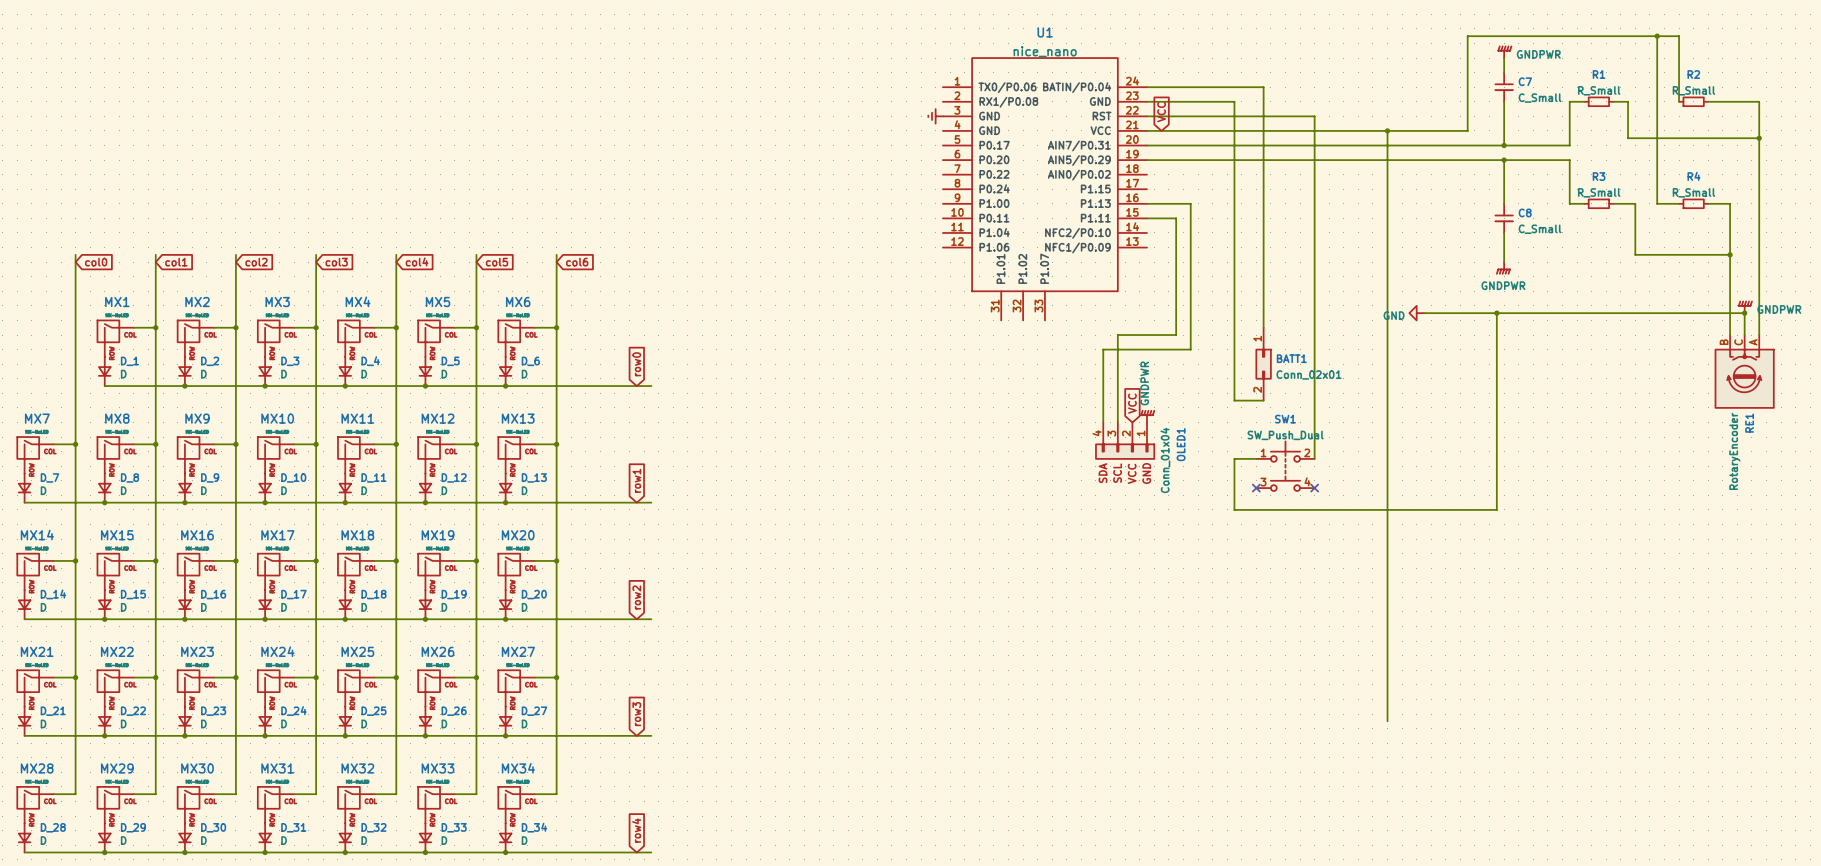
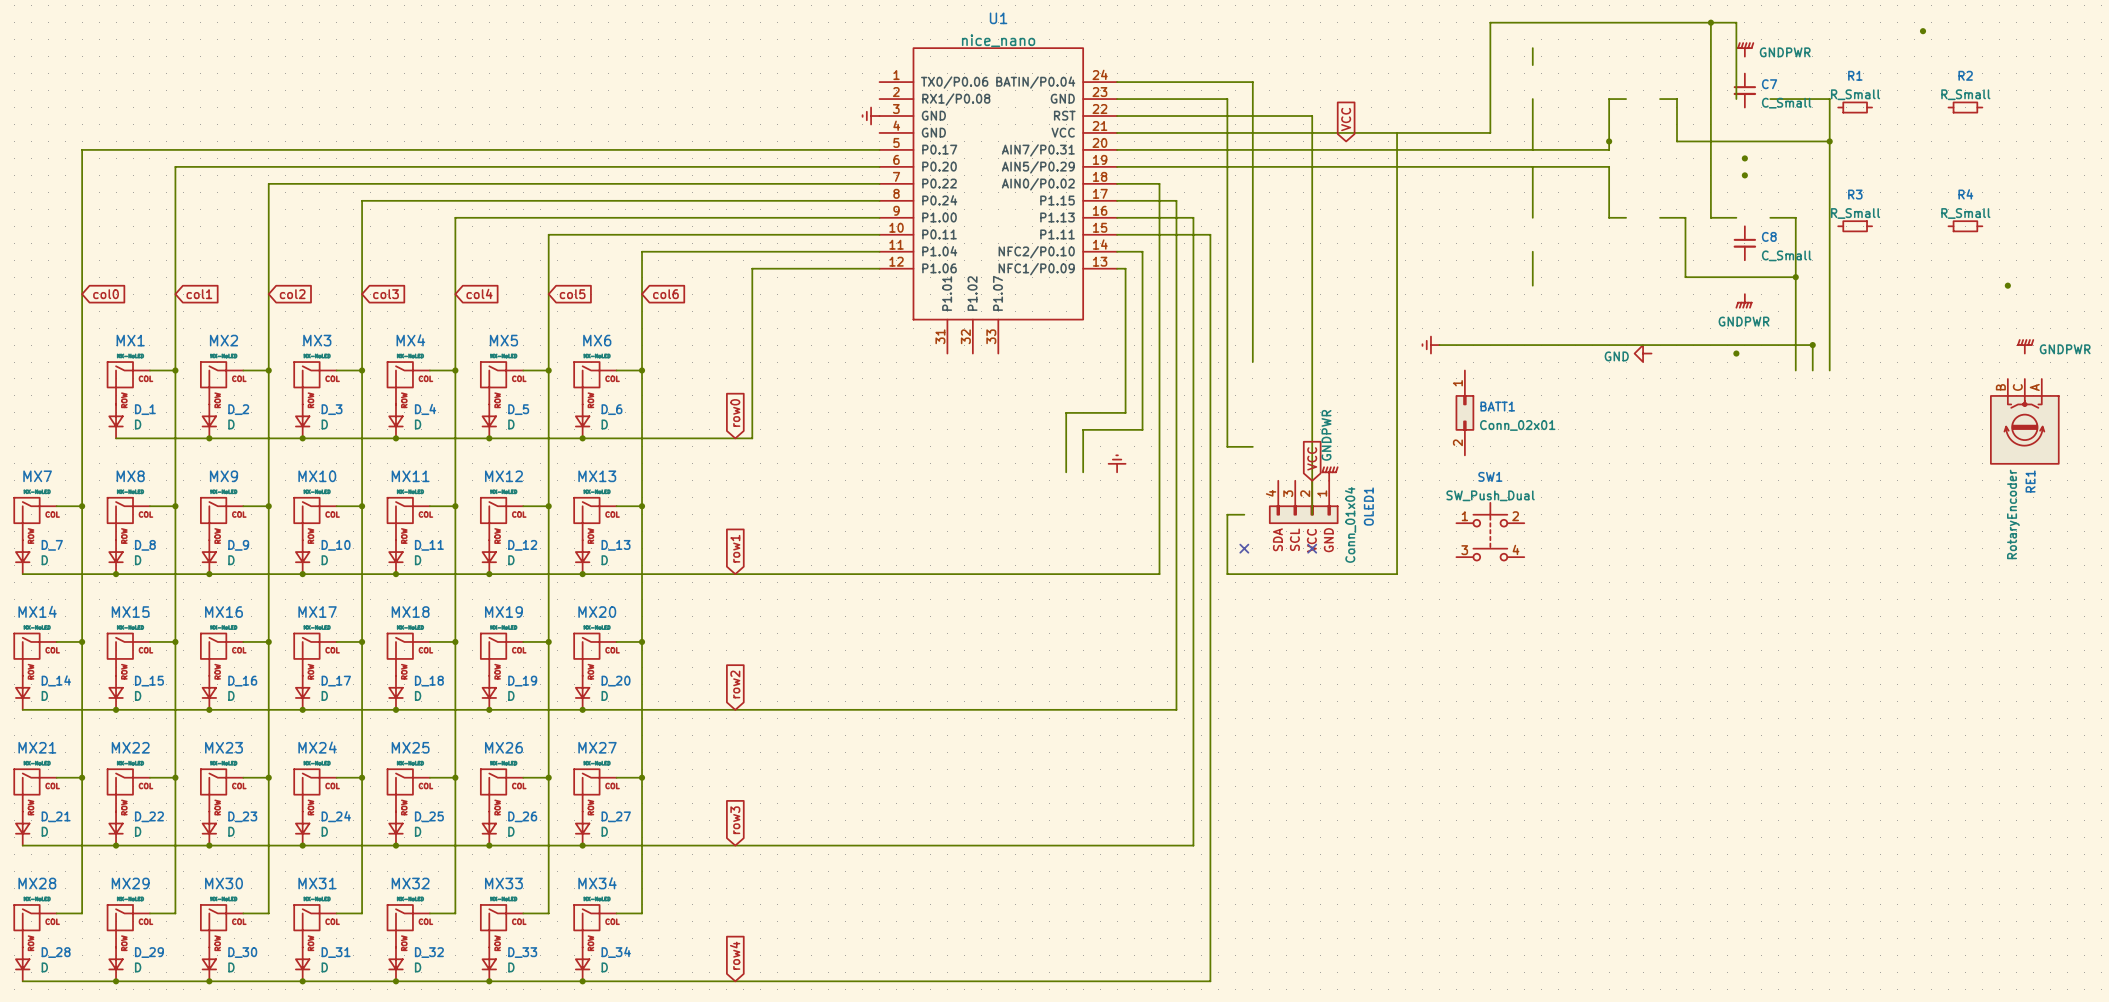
wire: none -> (1710, 22) (1710, 217) (1736, 217)
junction: none -> (1710, 22)
wire: (1657, 36) (1657, 203) (1679, 203) -> none
wire: none -> (1532, 48) (1532, 65)
wire: (1504, 58) (1504, 72) -> none
wire: none -> (1117, 82) (1252, 82) (1252, 362)
wire: (1146, 87) (1263, 87) (1263, 327) -> none
wire: none -> (1117, 99) (1227, 99) (1227, 446) (1252, 446)
wire: none -> (1532, 99) (1532, 149)
wire: none -> (1626, 99) (1609, 99) (1609, 141)
wire: none -> (1736, 99) (1736, 22) (1490, 22) (1490, 132) (1117, 132)
wire: none -> (1770, 99) (1829, 99) (1829, 370)
wire: (1146, 101) (1234, 101) (1234, 400) (1263, 400) -> none
wire: (1504, 101) (1504, 145) -> none
wire: (1584, 101) (1569, 101) (1569, 145) (1146, 145) -> none
wire: (1613, 101) (1628, 101) (1628, 138) (1759, 138) -> none
wire: (1679, 101) (1679, 36) (1467, 36) (1467, 130) -> (1829, 141) (1702, 141)
wire: (1708, 101) (1759, 101) (1759, 335) -> none
power symbol: none -> (871, 116)
wire: none -> (1117, 116) (1312, 116) (1312, 514)
power symbol: (935, 116) -> none
wire: (1146, 116) (1314, 116) (1314, 458) -> none
wire: none -> (1397, 132) (1397, 574) (1227, 574) (1227, 514) (1244, 514)
wire: (1146, 130) (1445, 130) -> (1660, 99) (1676, 99) (1676, 141)
junction: none -> (1829, 141)
wire: none -> (879, 149) (82, 149) (82, 285)
wire: (1387, 138) (1387, 152) -> (1609, 149) (1117, 149)
junction: (1759, 138) -> none
wire: none -> (879, 166) (175, 166) (175, 285)
wire: none -> (1117, 166) (1609, 166)
wire: none -> (1532, 166) (1532, 217)
wire: (1146, 160) (1569, 160) (1569, 203) (1584, 203) -> none
wire: (1504, 160) (1504, 203) -> none
wire: none -> (879, 183) (268, 183) (268, 285)
wire: none -> (1117, 183) (1159, 183) (1159, 574) (752, 574)
wire: none -> (879, 200) (362, 200) (362, 285)
wire: none -> (1117, 200) (1176, 200) (1176, 709) (752, 709)
U1 position: (1044, 189) -> (998, 200)
wire: none -> (879, 217) (455, 217) (455, 285)
wire: none -> (1117, 217) (1193, 217) (1193, 845) (752, 845)
wire: (1387, 196) (1387, 721) -> (1609, 217) (1626, 217)
wire: none -> (1660, 217) (1685, 217) (1685, 277) (1795, 277)
wire: none -> (1770, 217) (1795, 217) (1795, 370)
wire: (1146, 203) (1190, 203) (1190, 349) (1103, 349) (1103, 422) -> none
wire: (1613, 203) (1635, 203) (1635, 254) (1730, 254) -> none
wire: (1708, 203) (1730, 203) (1730, 335) -> none
wire: none -> (879, 234) (548, 234) (548, 285)
wire: none -> (1117, 234) (1210, 234) (1210, 981) (752, 981)
wire: (1146, 218) (1176, 218) (1176, 335) (1117, 335) (1117, 422) -> none
wire: none -> (879, 251) (642, 251) (642, 285)
wire: none -> (1117, 251) (1142, 251) (1142, 429) (1083, 429) (1083, 472)
wire: none -> (1532, 251) (1532, 285)
wire: (1504, 232) (1504, 262) -> none
wire: none -> (879, 268) (752, 268) (752, 438)
wire: none -> (1117, 268) (1125, 268) (1125, 412) (1066, 412) (1066, 472)
junction: none -> (1795, 277)
power symbol: none -> (1430, 345)
wire: none -> (1439, 345) (1812, 345) (1812, 370)
junction: none -> (1812, 345)
wire: (1423, 313) (1744, 313) (1744, 335) -> none
wire: (1496, 313) (1496, 509) (1234, 509) (1234, 458) (1256, 458) -> none
junction: (1744, 313) -> none
power symbol: none -> (1117, 463)
no-connect mark: none -> (1244, 548)
no-connect mark: none -> (1312, 548)
no-connect mark: (1256, 488) -> none
no-connect mark: (1314, 488) -> none

